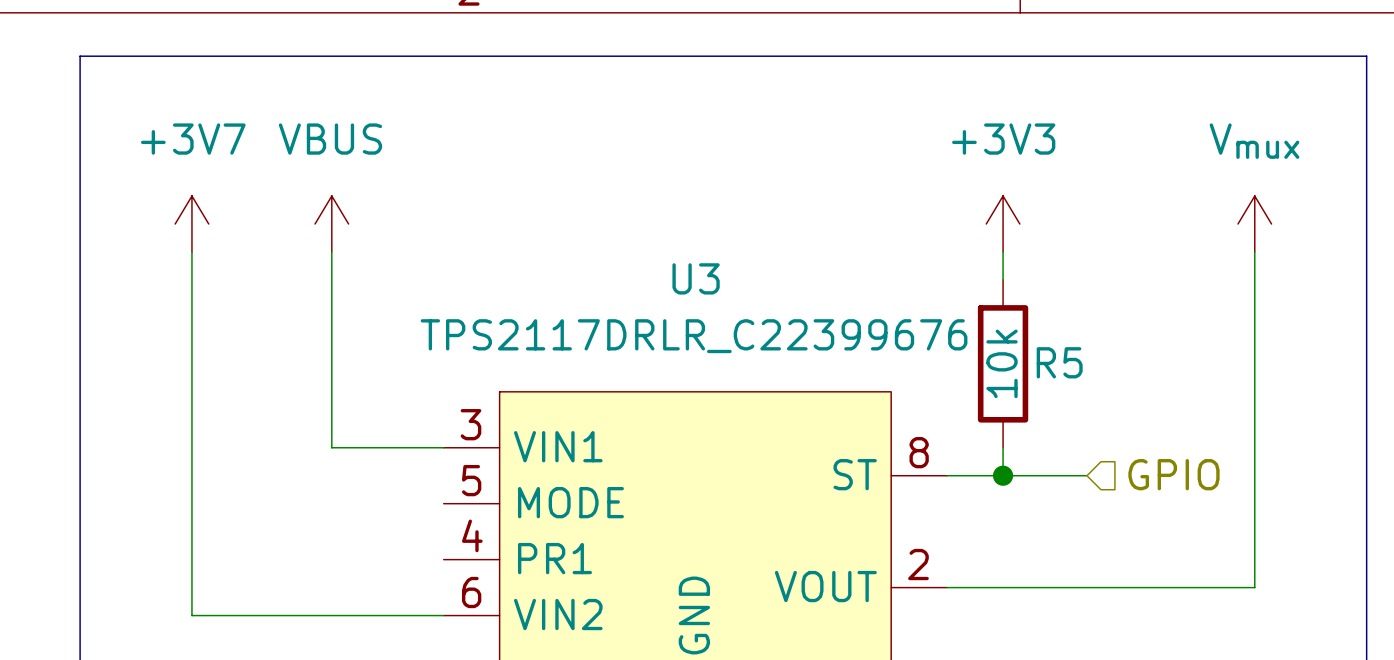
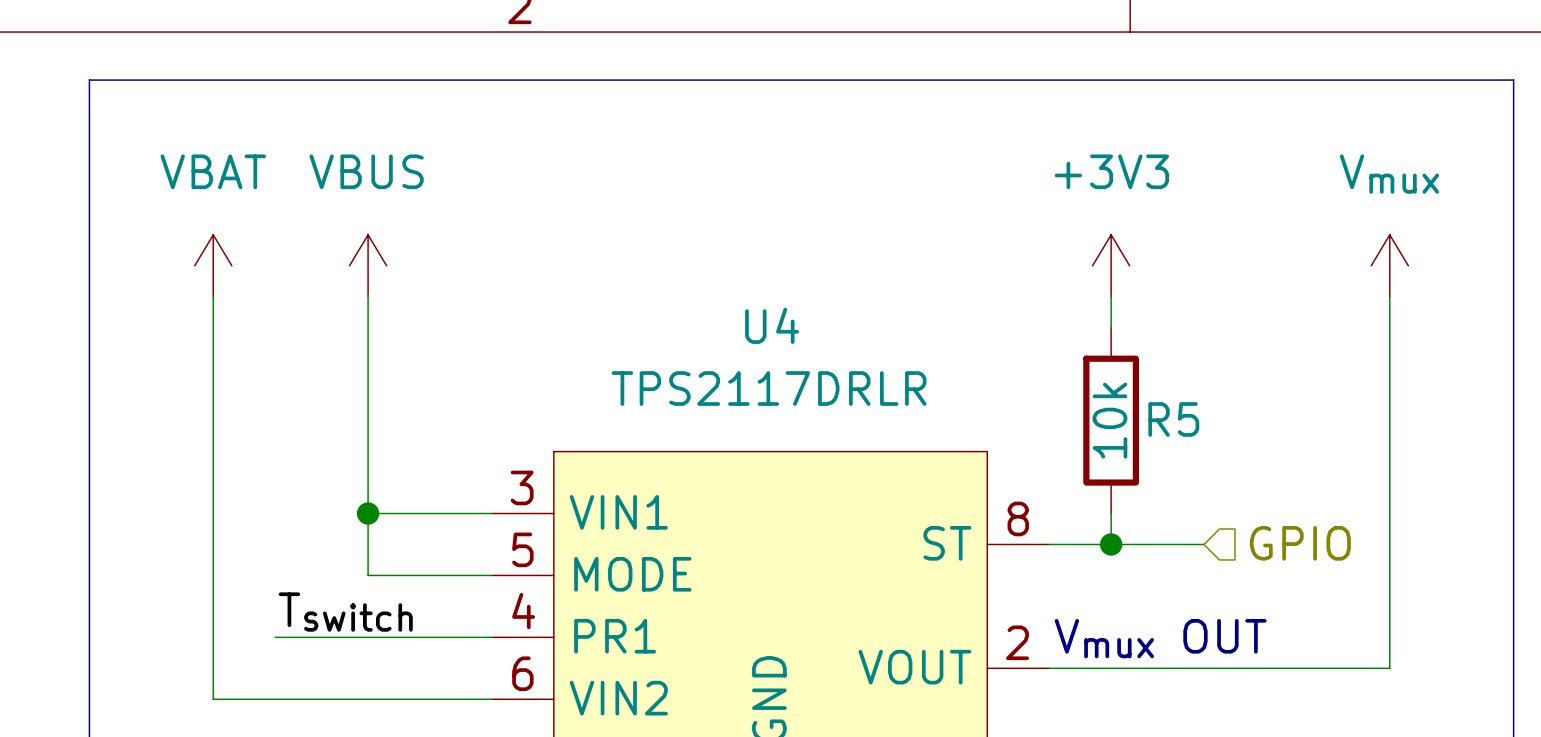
power symbol: +3V7 (191, 224) -> VBAT (213, 265)
U3 name: U3 (696, 278) -> U4 (772, 325)
U3 value: TPS2117DRLR_C22399676 (694, 336) -> TPS2117DRLR (769, 388)
wire: none -> (368, 513) (368, 575) (491, 575)
junction: none -> (368, 513)
label: none -> Tswitch (345, 612)
wire: none -> (275, 637) (491, 637)
text: none -> Vmux OUT (1160, 638)

